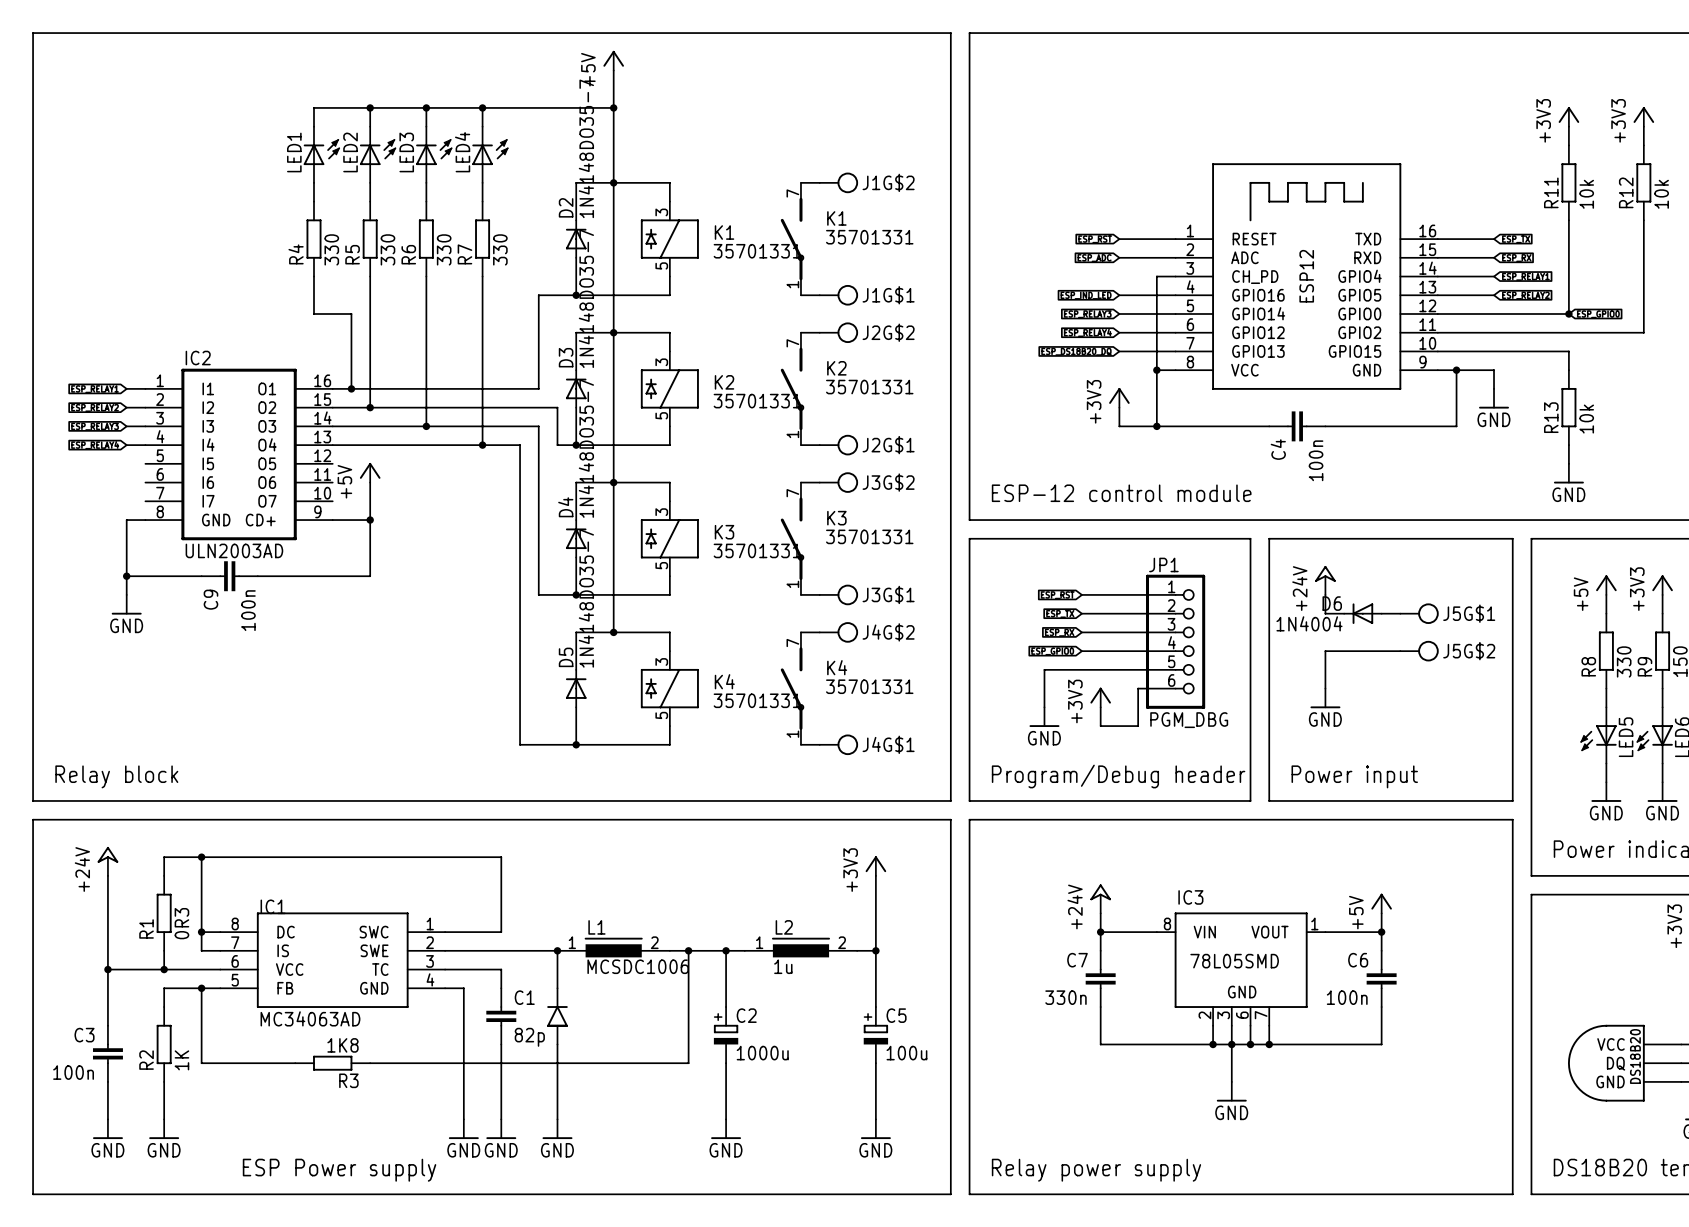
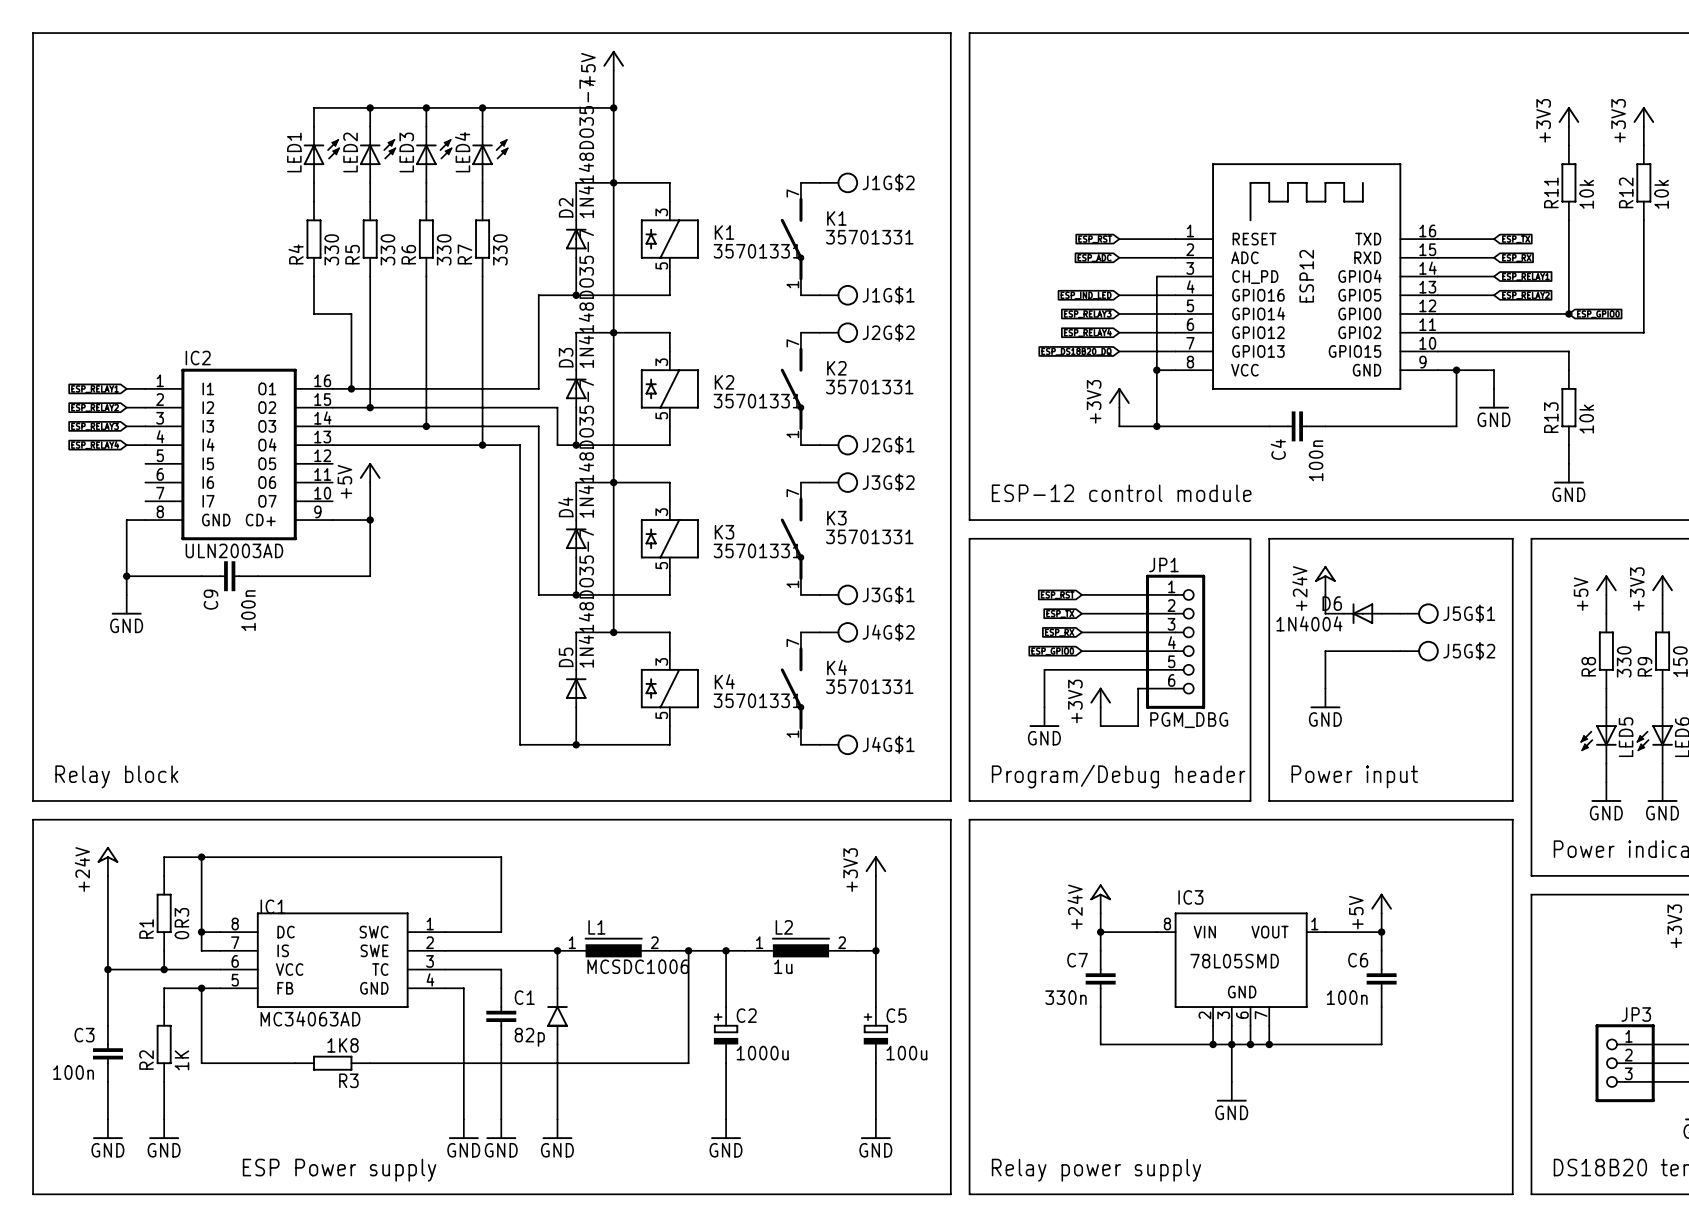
part: (1624, 1063) -> none
JP3: none -> (1625, 1063)

